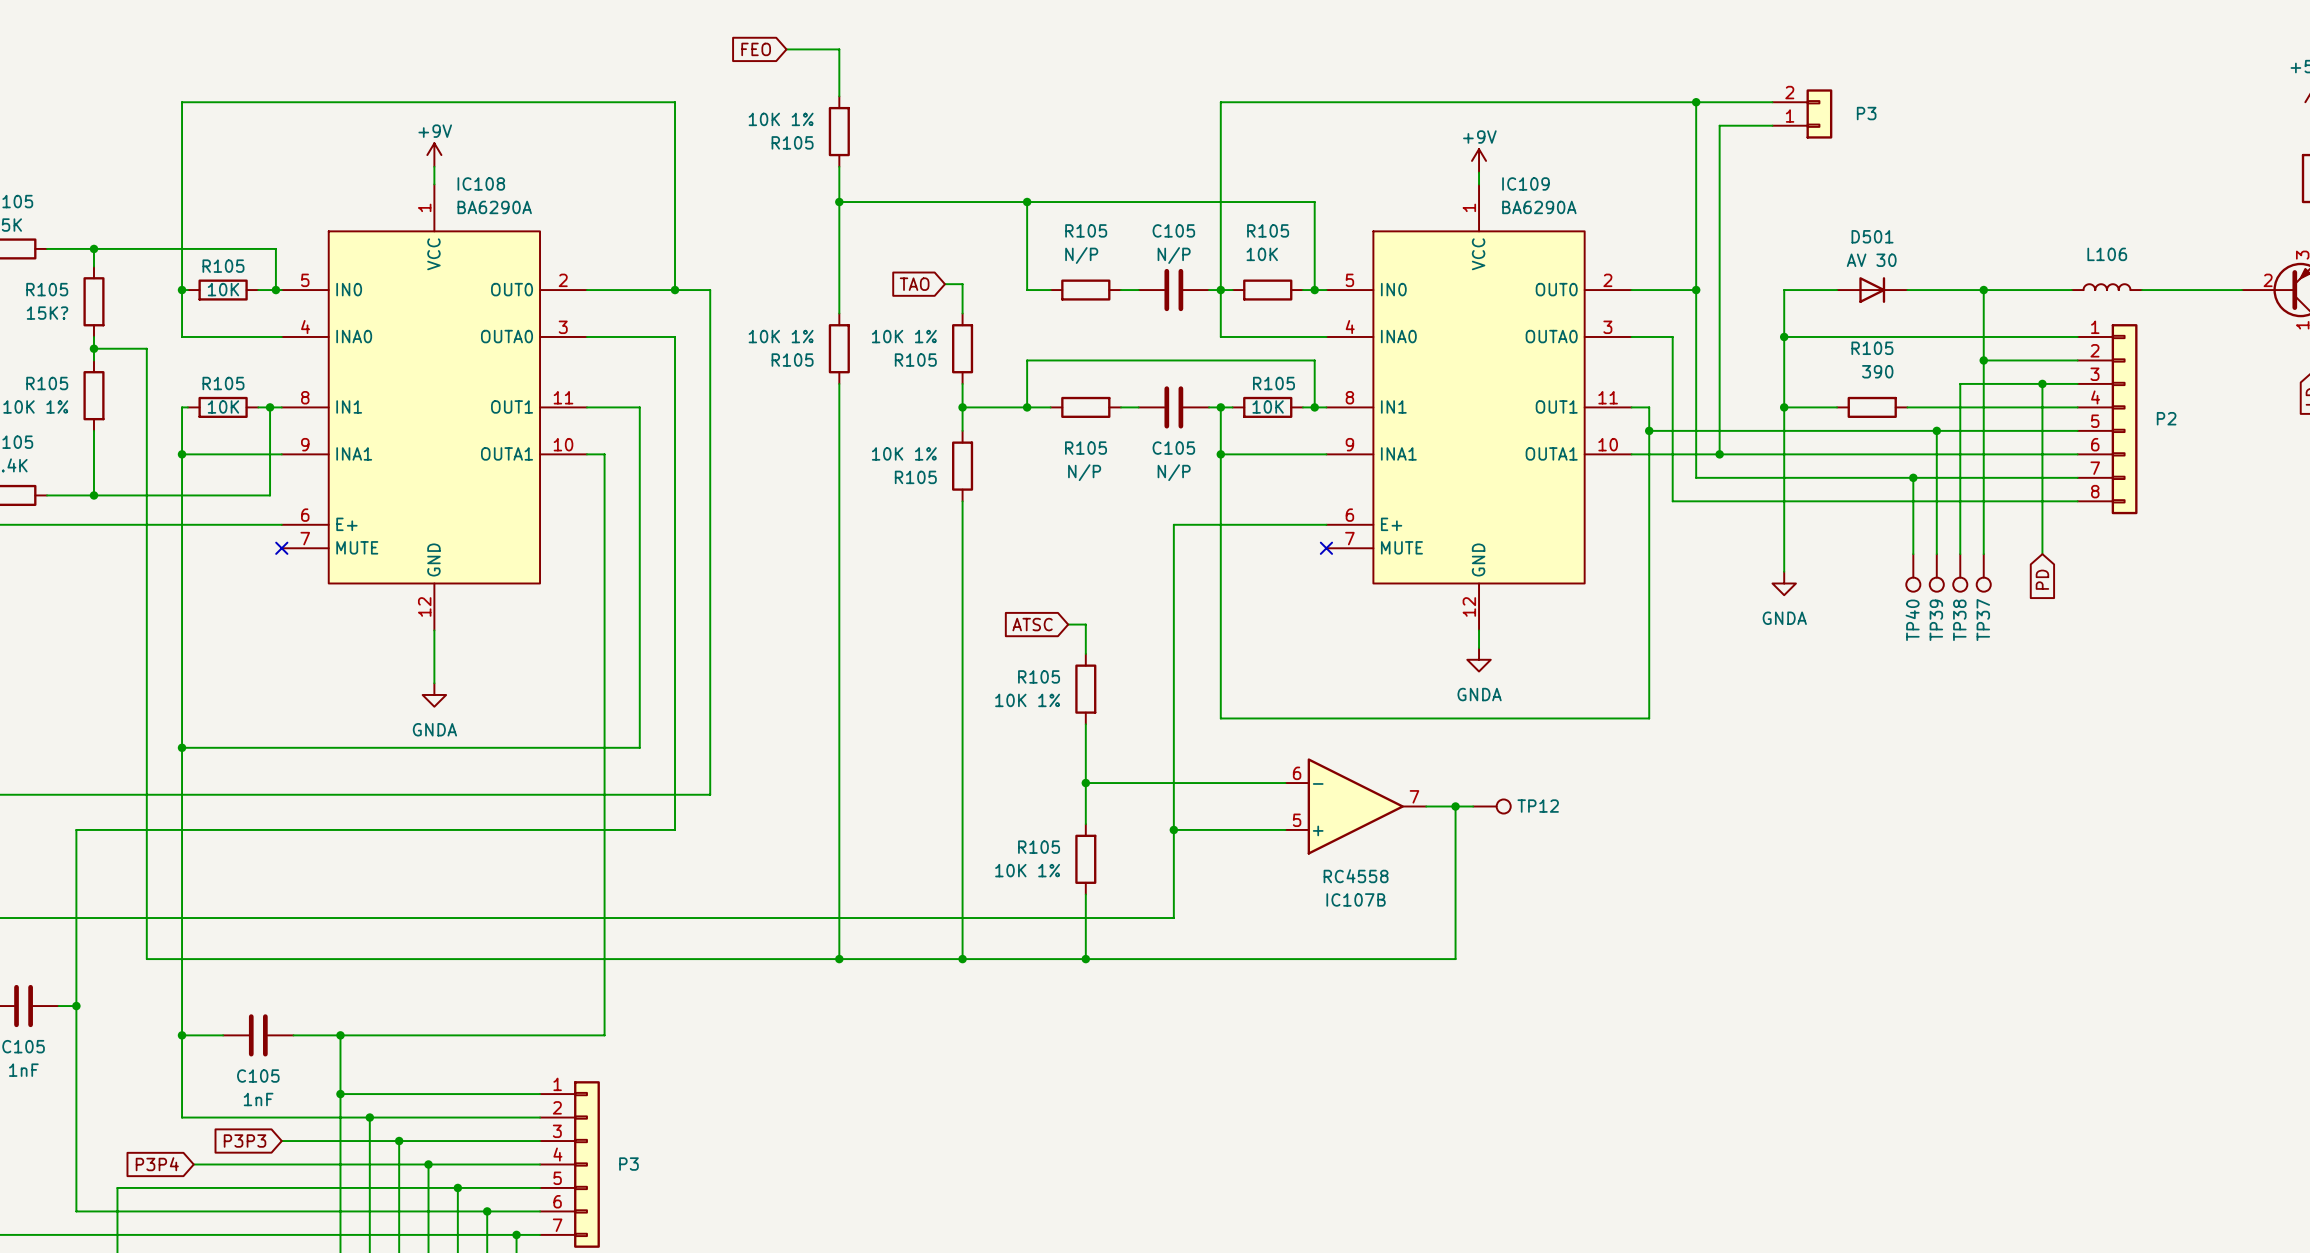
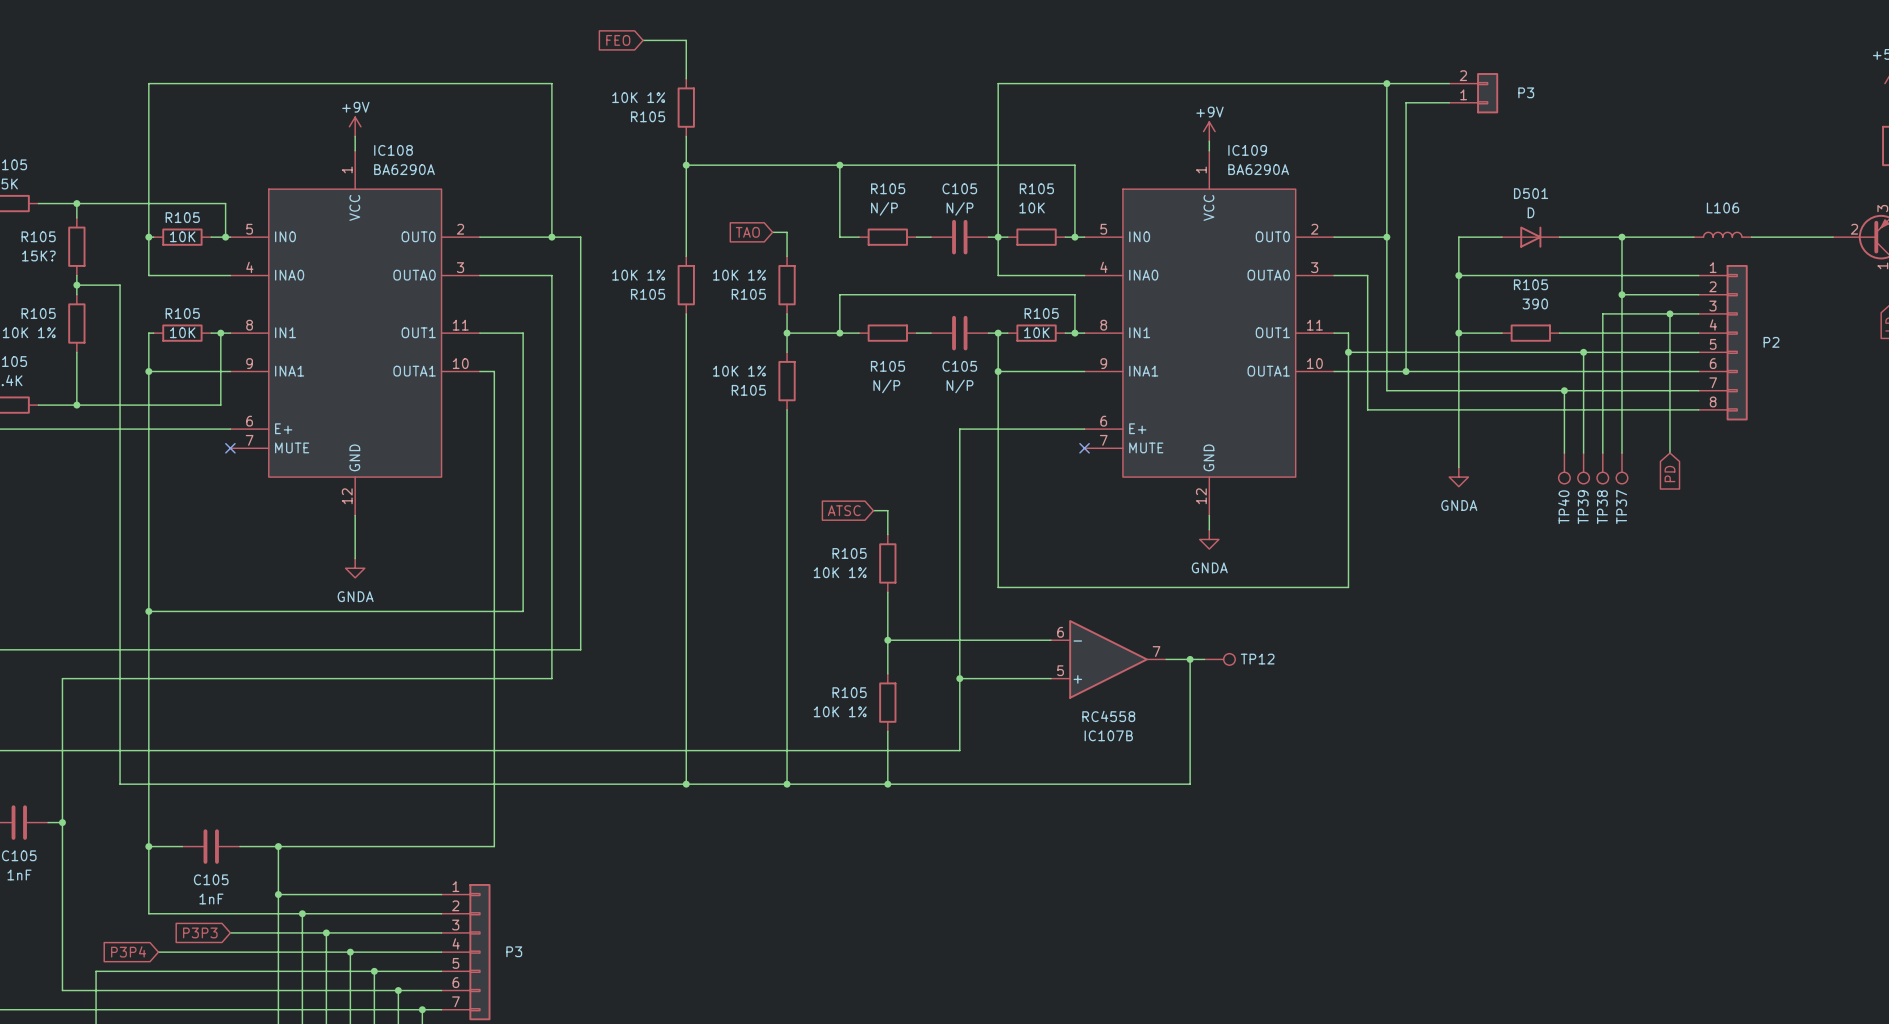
D501 value: AV 30 (1871, 260) -> D (1531, 212)

